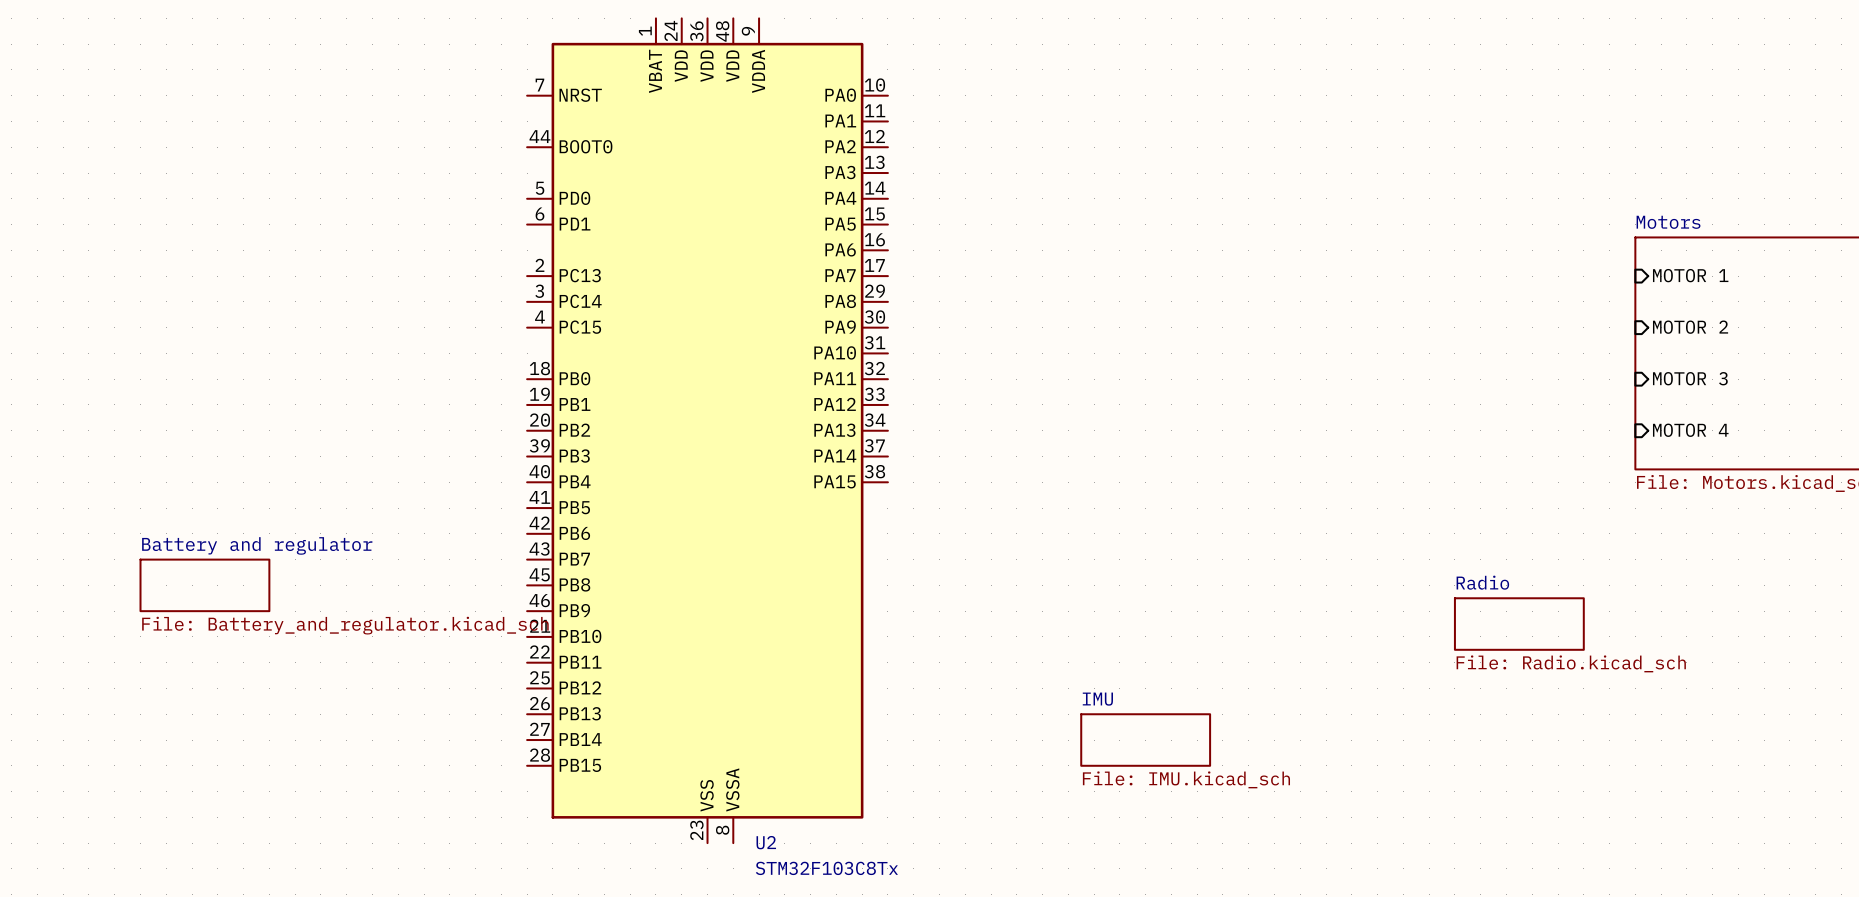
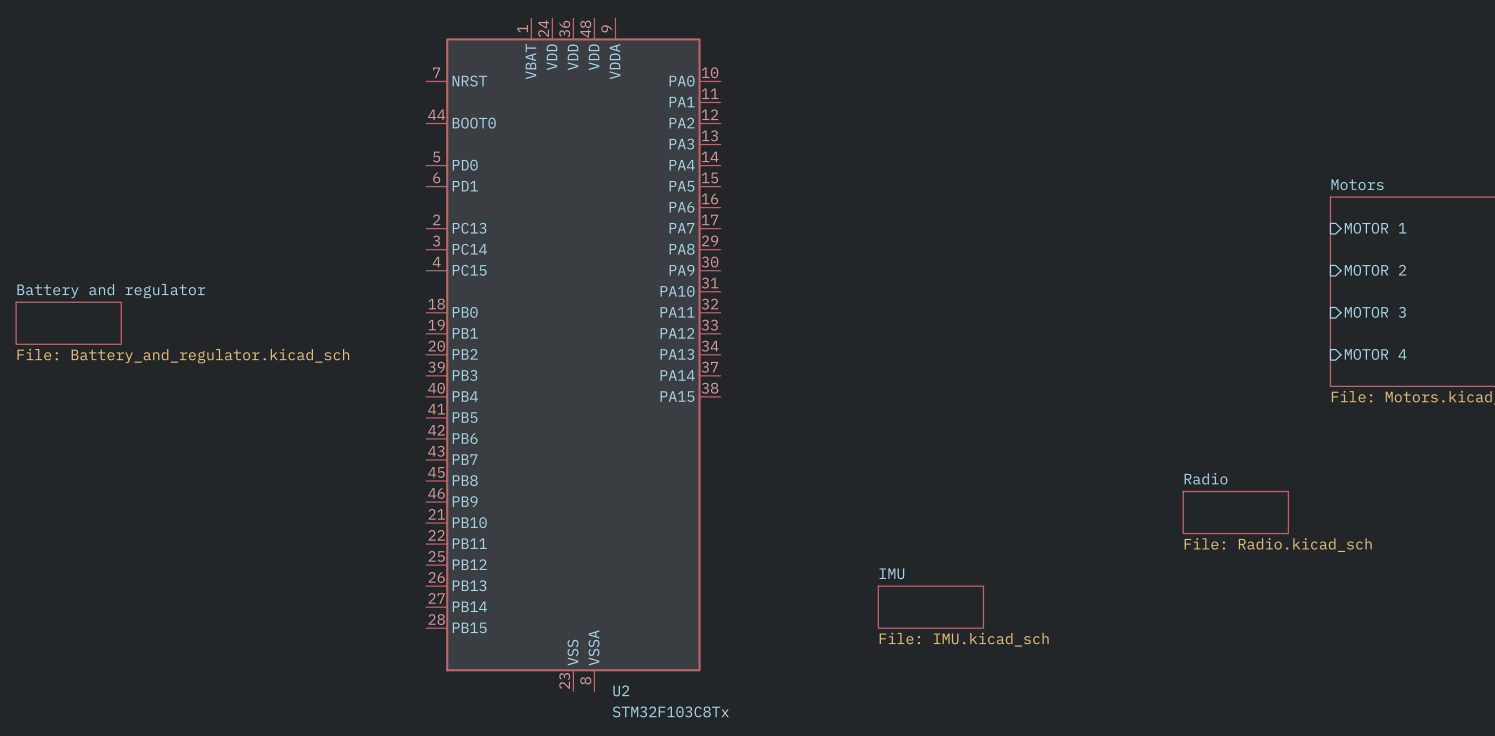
sheet Battery and regulator position: (204, 585) -> (68, 323)

